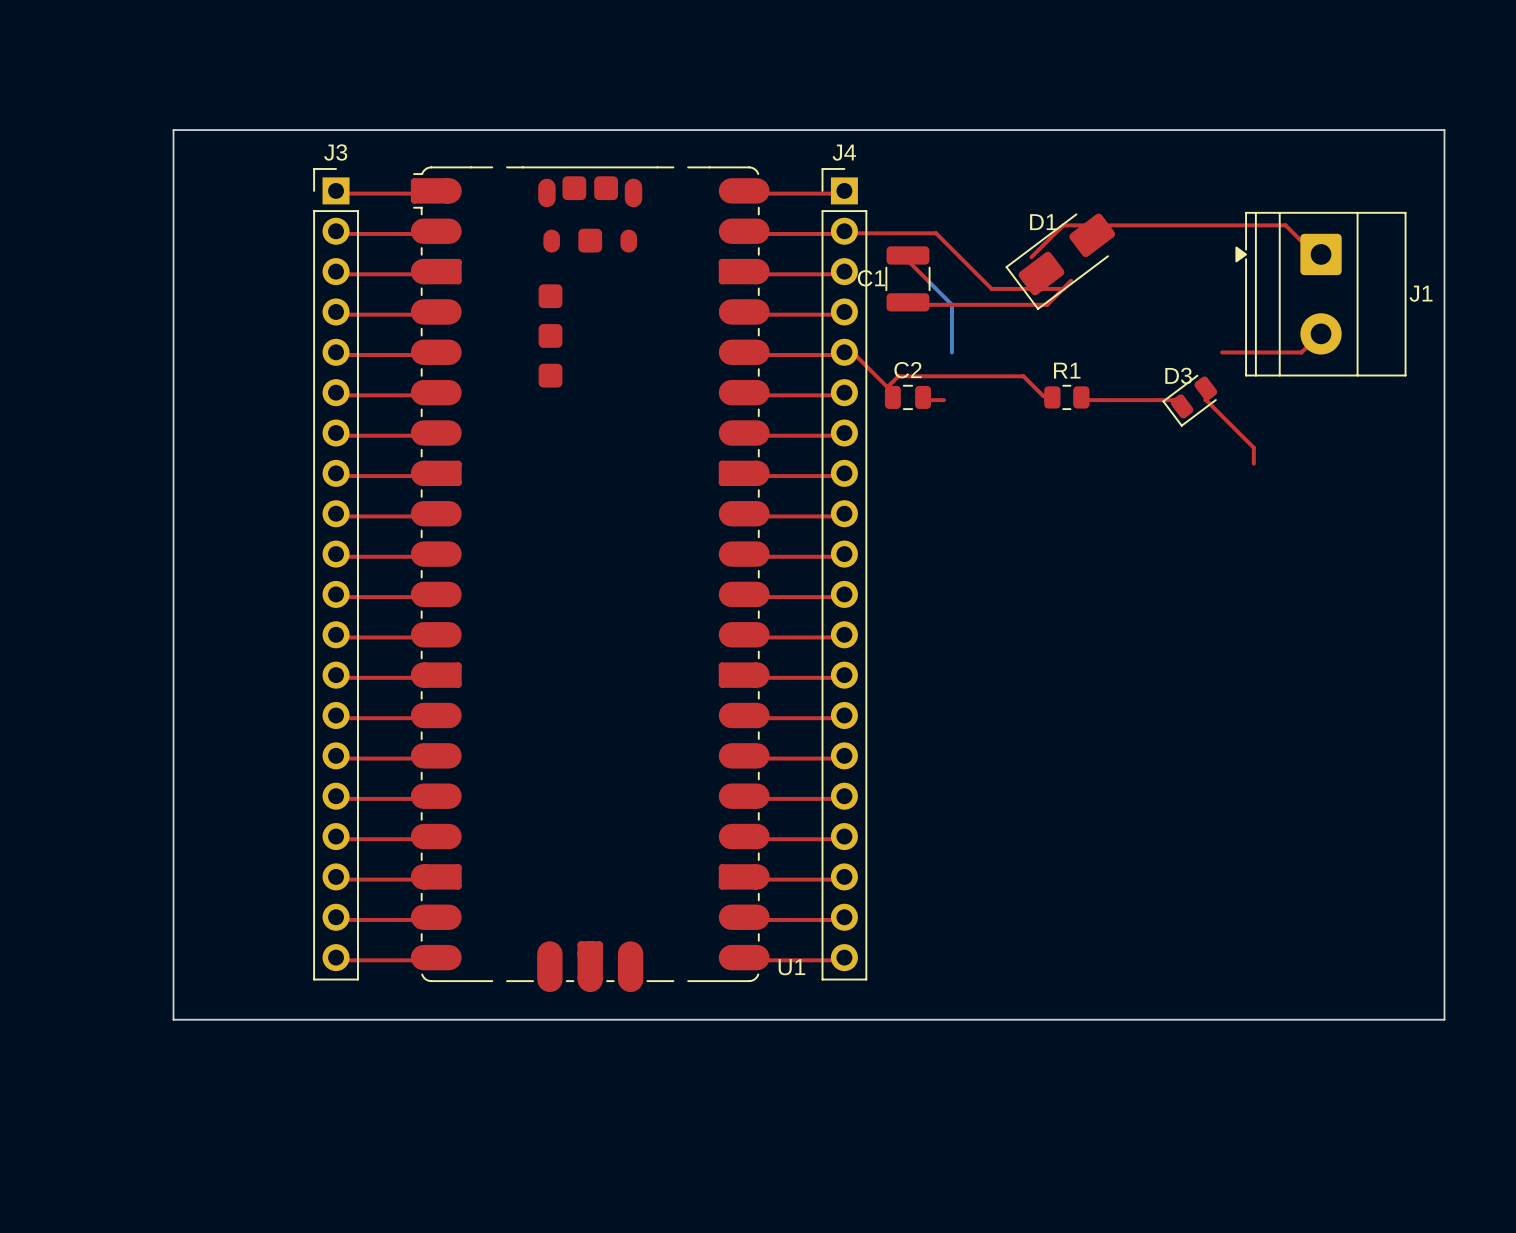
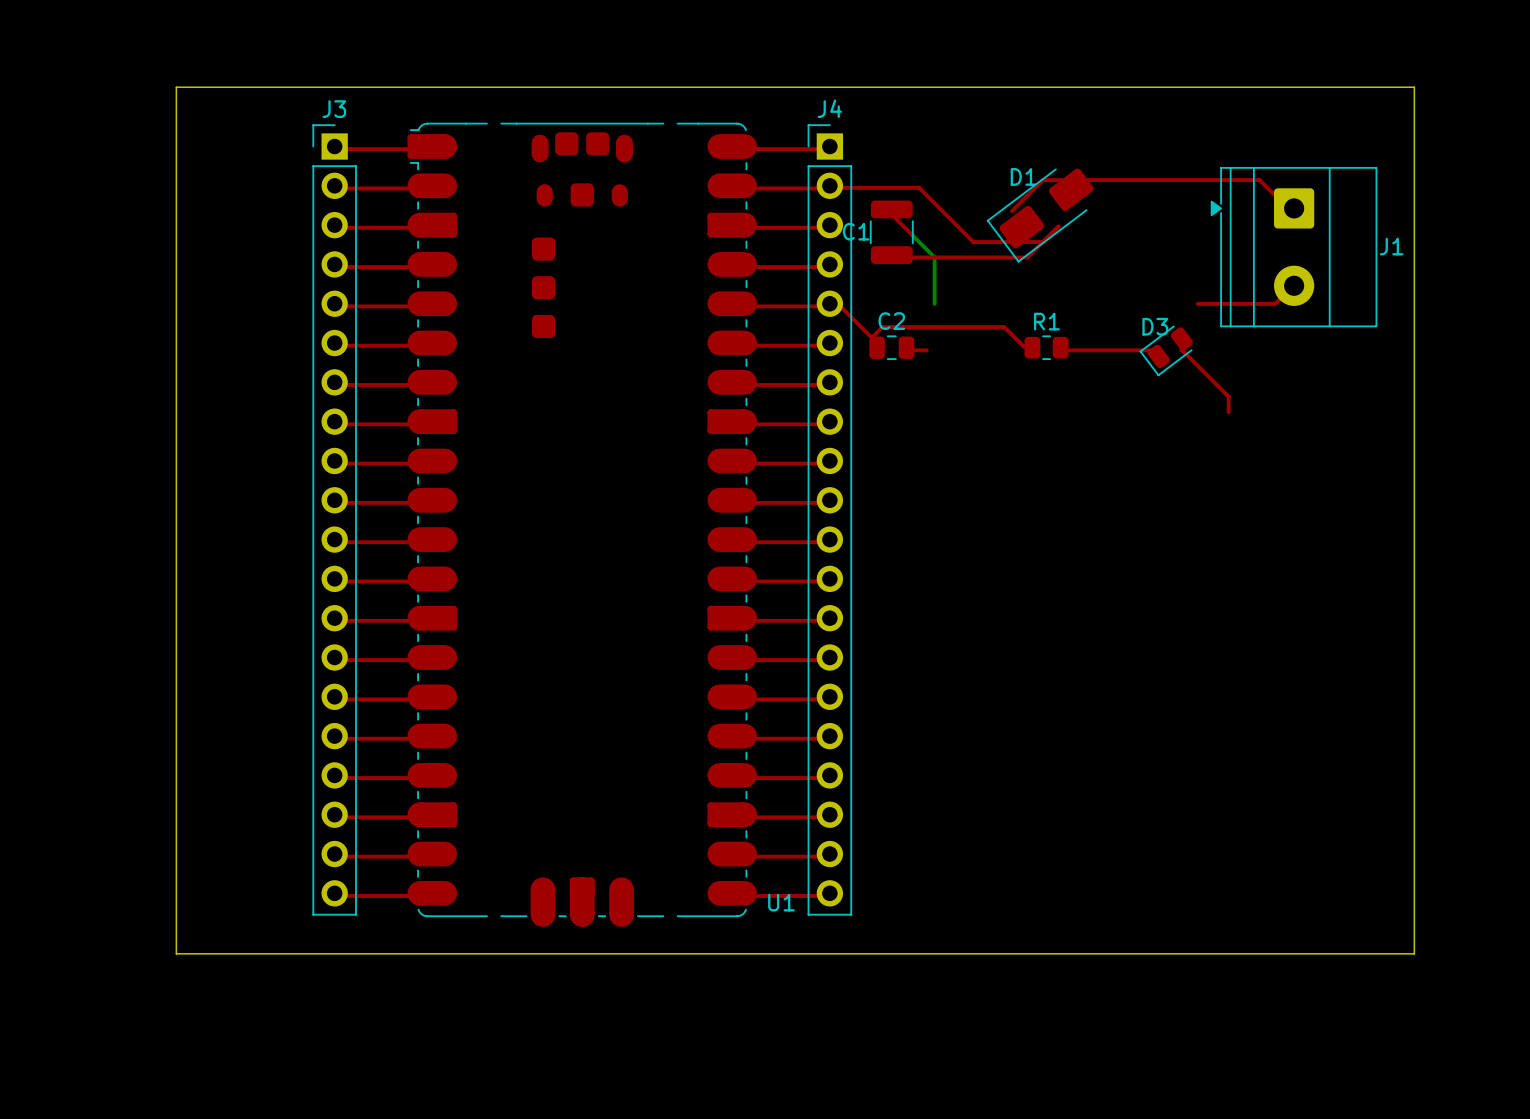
top track: none -> (1058, 226) (1050, 234)

